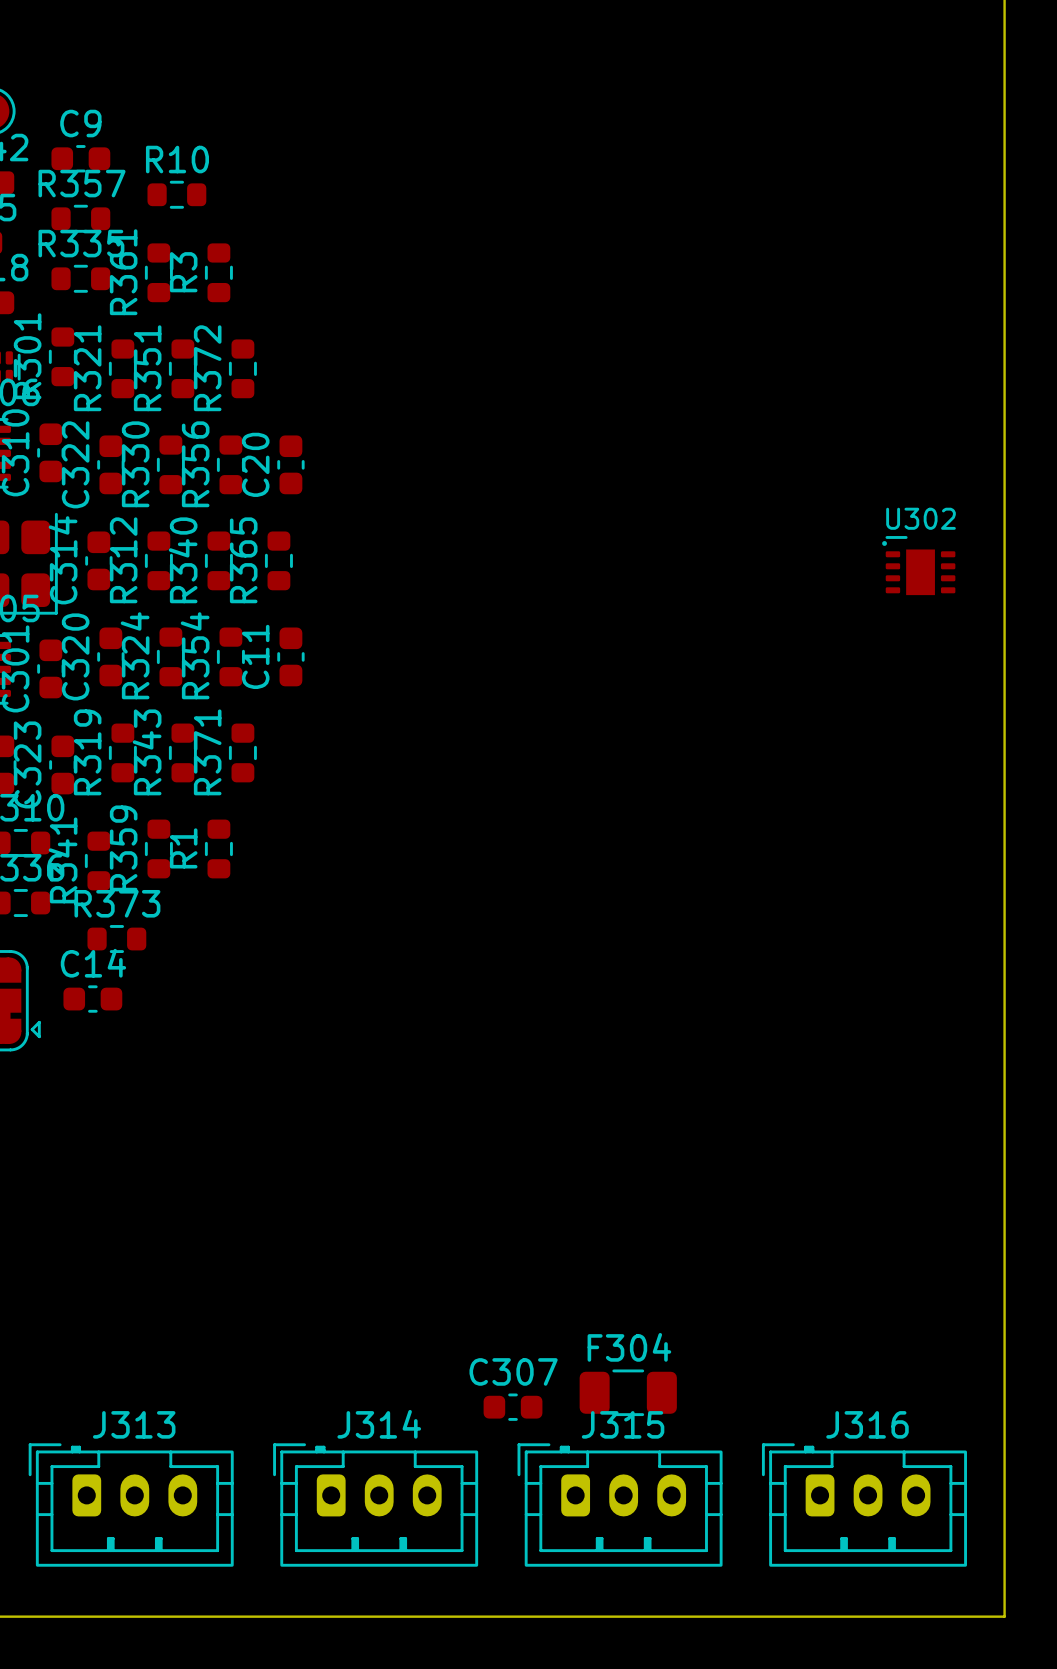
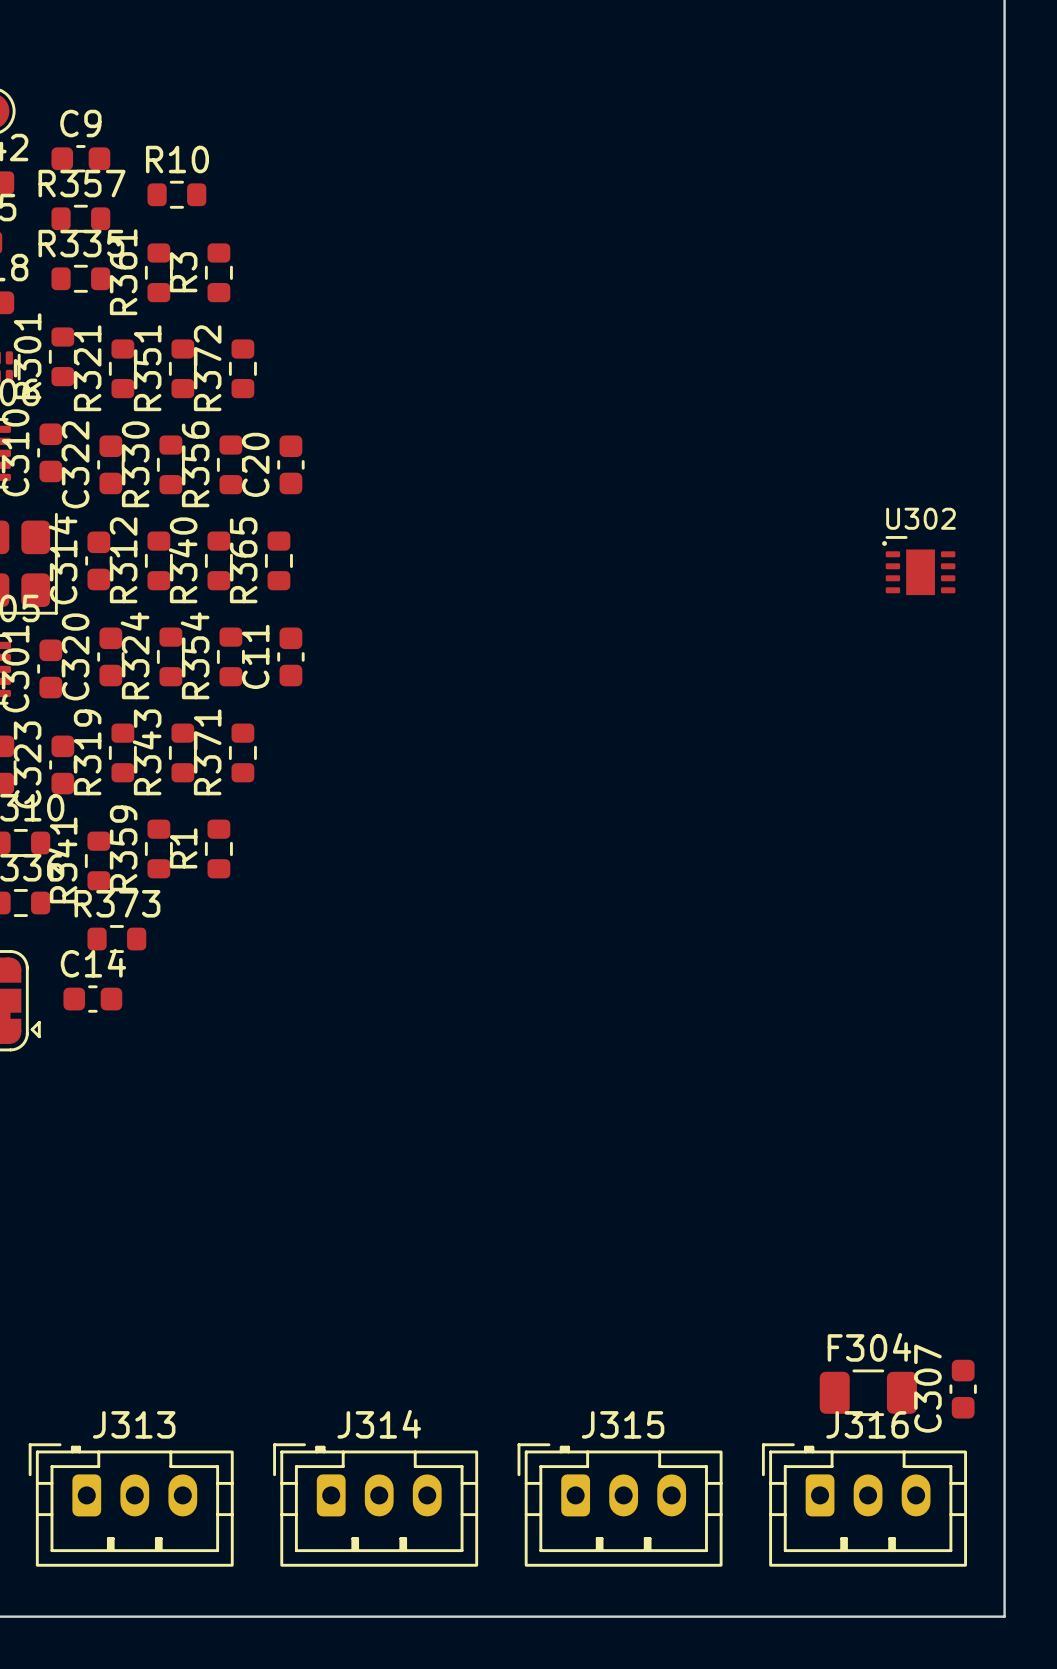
C307 name position: C307 (513, 1371) -> C307 (927, 1388)
F304 position: (628, 1392) -> (868, 1392)
C307 rotation: 0° (513, 1407) -> 90° clockwise (963, 1389)
C307 position: (513, 1407) -> (963, 1389)

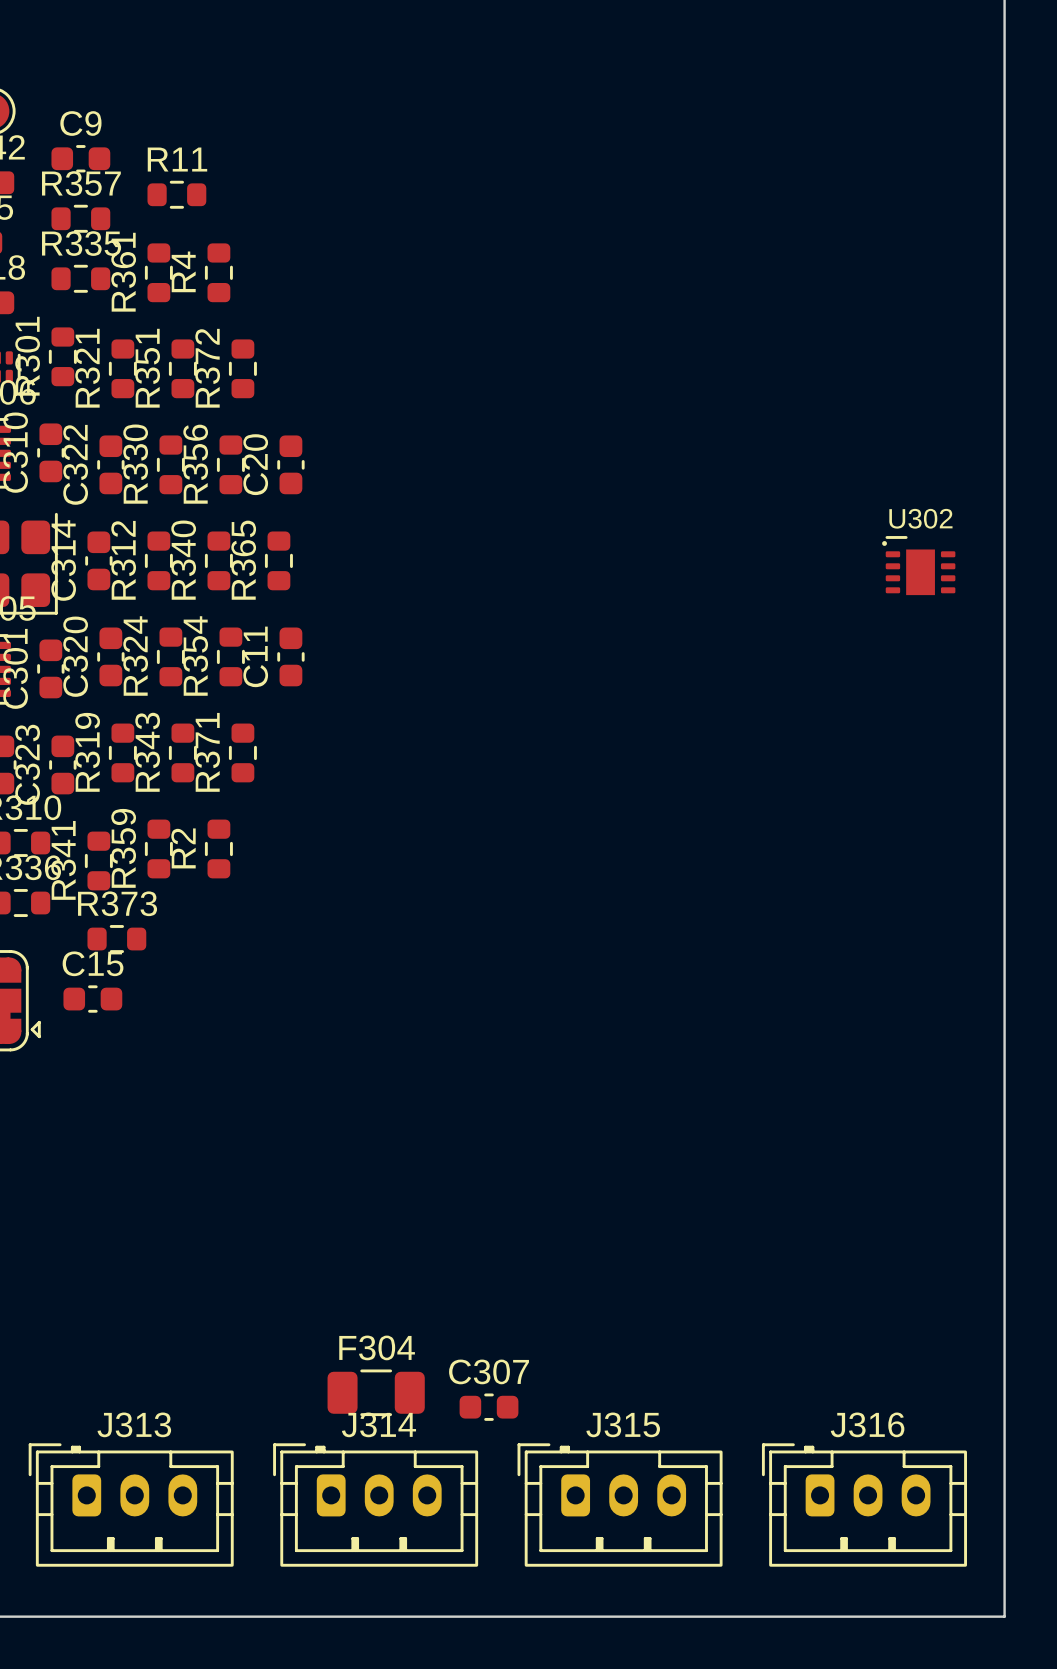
R10 name: R10 (177, 159) -> R11 (177, 159)
R3 name: R3 (183, 272) -> R4 (183, 271)
R1 name: R1 (183, 848) -> R2 (183, 848)
C14 name: C14 (93, 963) -> C15 (93, 963)
C307 rotation: 0° (963, 1389) -> 90° clockwise (489, 1407)
C307 position: (963, 1389) -> (489, 1407)
F304 position: (868, 1392) -> (376, 1392)

